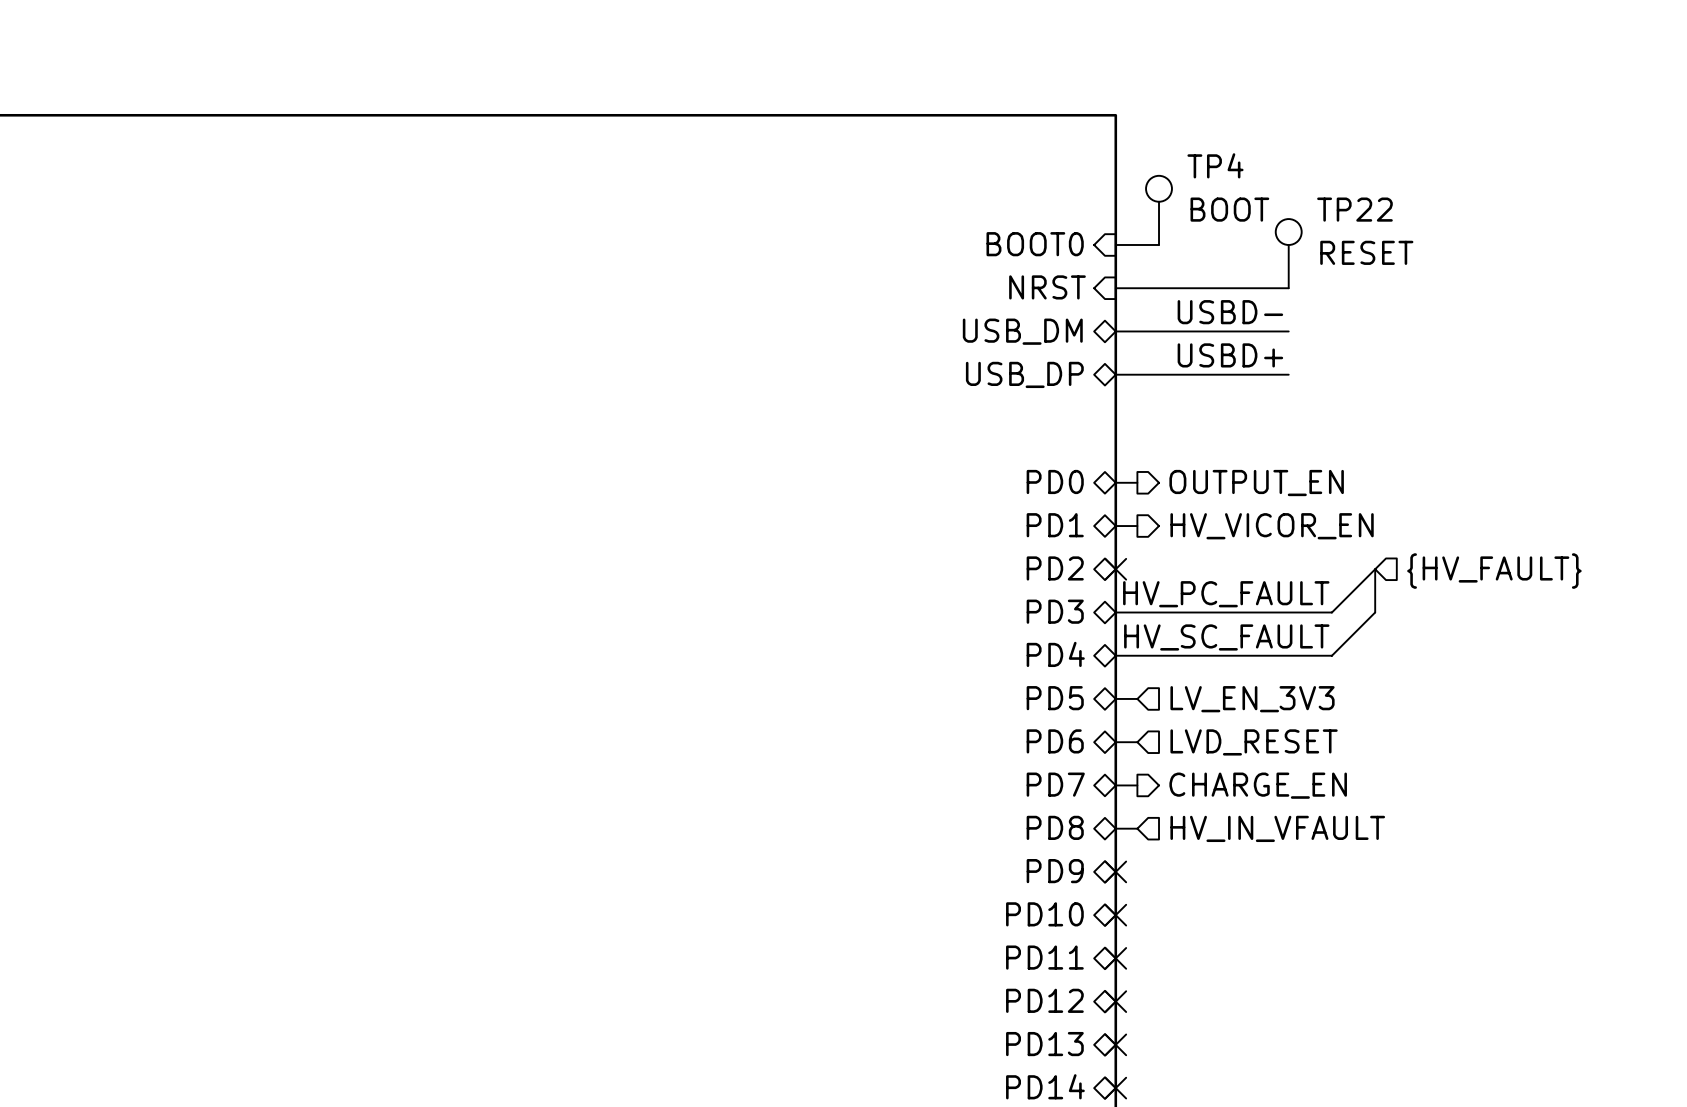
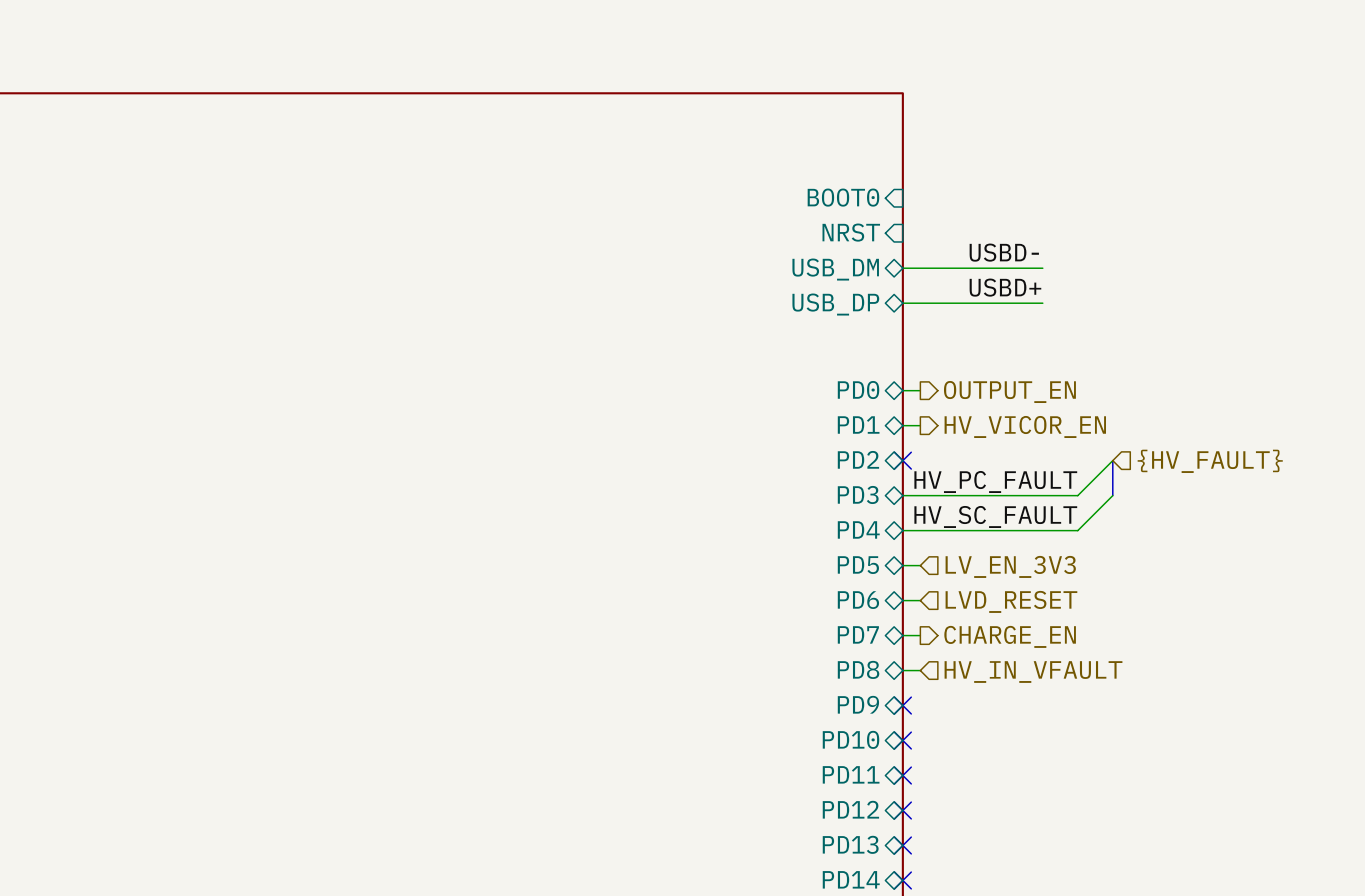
TP4: BOOT (1159, 210) -> none
wire: (1115, 244) (1159, 244) -> none
TP22: RESET (1288, 253) -> none
wire: (1115, 288) (1288, 288) -> none

